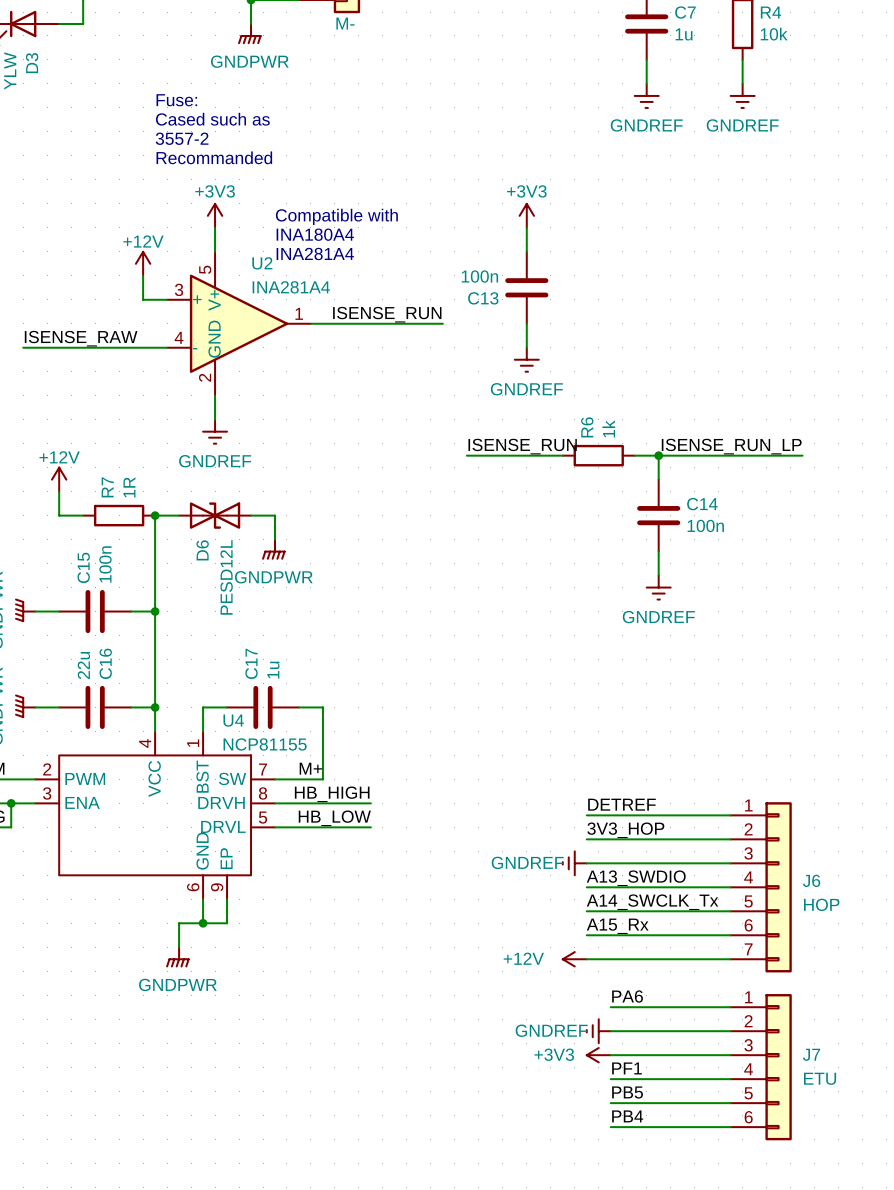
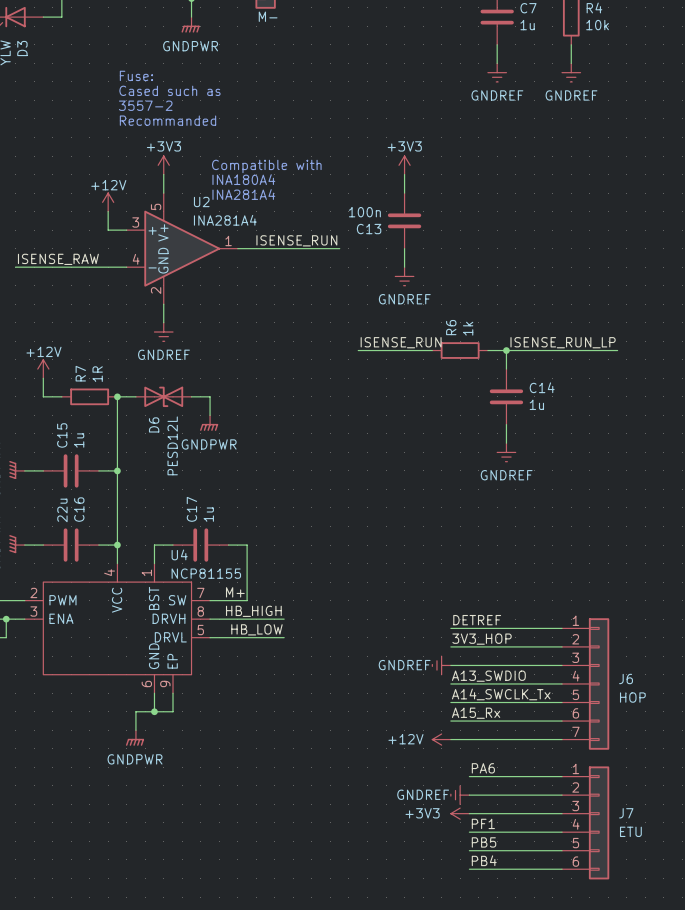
C14 value: 100n (705, 525) -> 1u (536, 404)
C15 value: 100n (105, 564) -> 1u (79, 440)

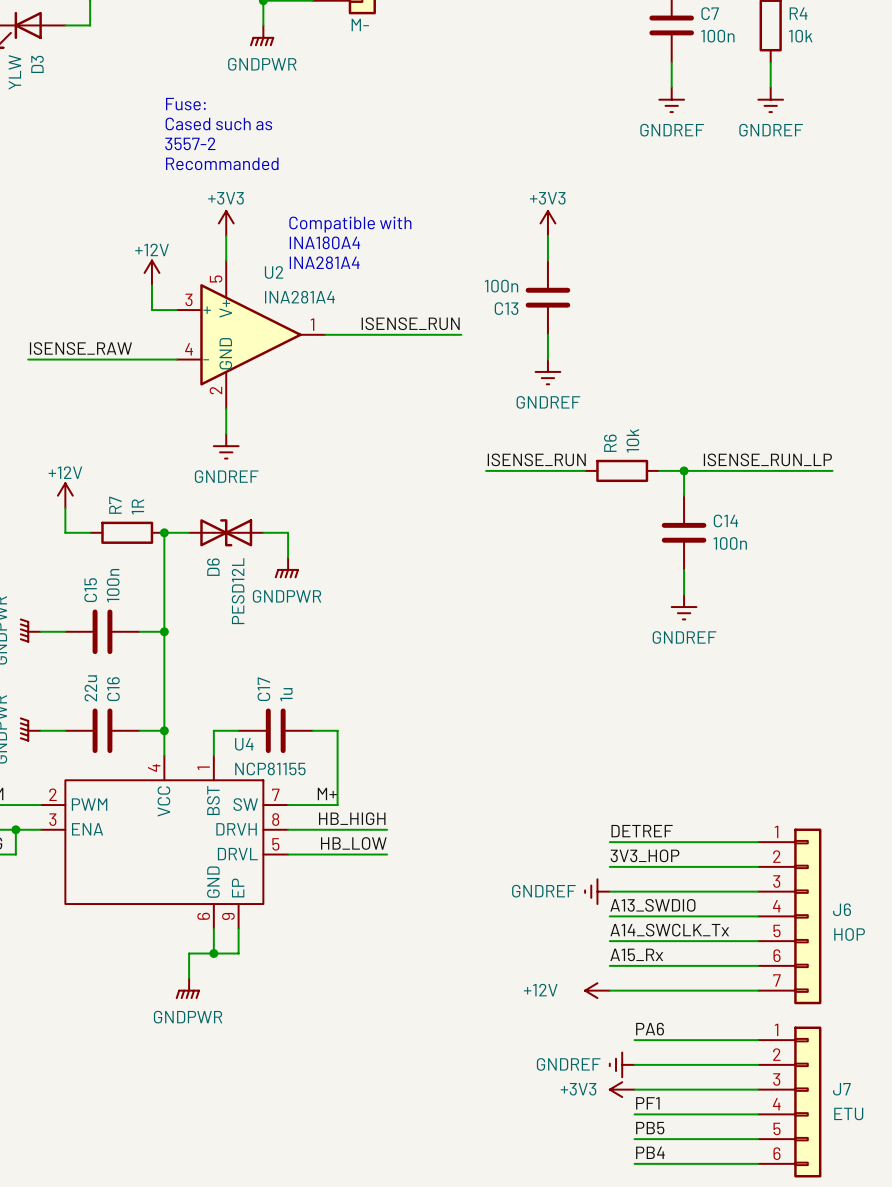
C7 value: 1u (527, 25) -> 100n (717, 36)
R6 value: 1k (468, 328) -> 10k (632, 440)
C14 value: 1u (536, 404) -> 100n (730, 543)
C15 value: 1u (79, 440) -> 100n (113, 585)

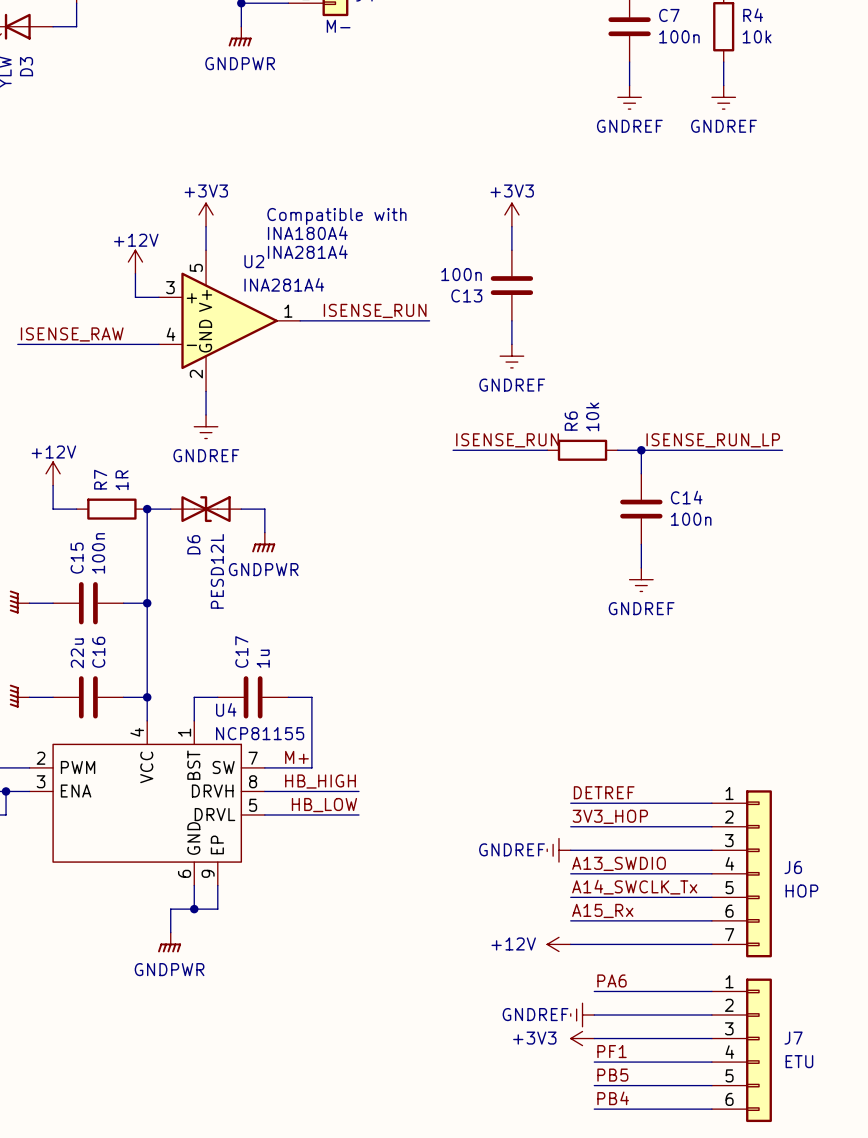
text: Fuse: (185, 104) -> none
text: Cased such as (218, 123) -> none
text: 3557-2 (190, 143) -> none
text: Recommanded (222, 163) -> none

